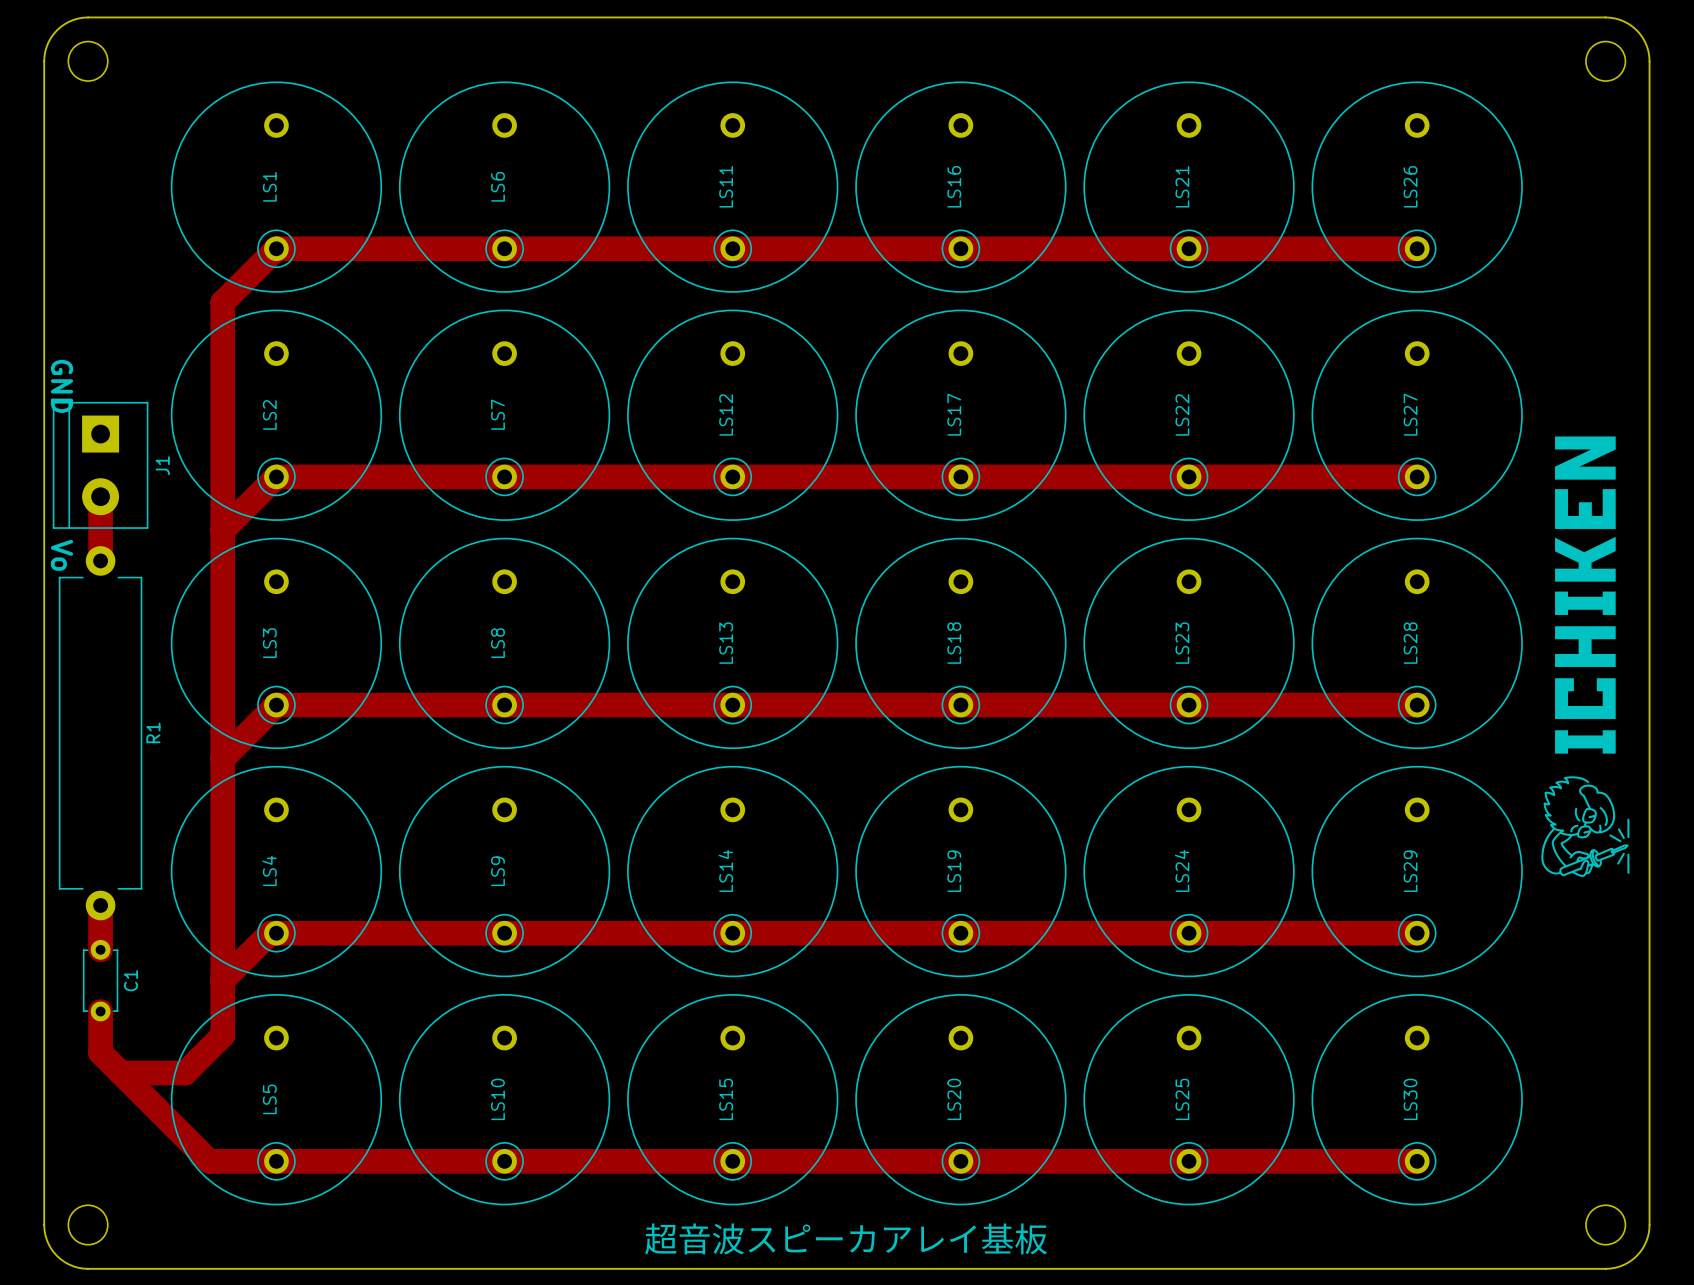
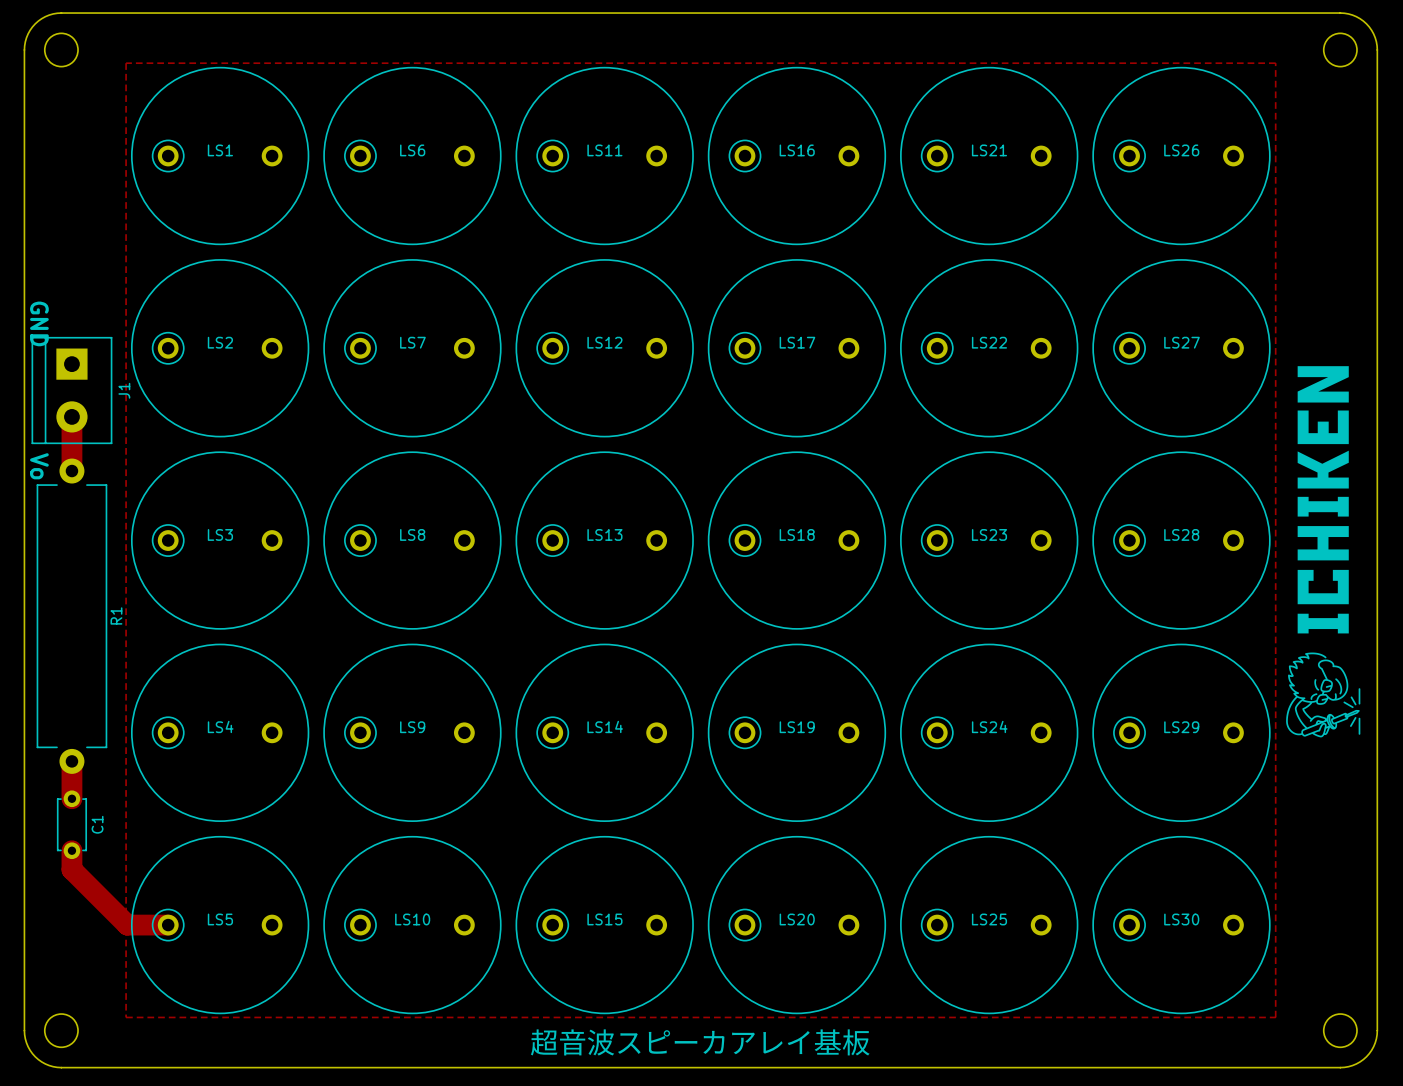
zone outline: none -> (126, 63) (126, 1017) (1275, 1017) (1275, 63) (126, 63)
LS1 rotation: 0° (276, 187) -> 90° clockwise (220, 156)
LS6 rotation: 0° (504, 187) -> 90° clockwise (412, 156)
LS11 rotation: 0° (732, 187) -> 90° clockwise (604, 156)
LS16 rotation: 0° (960, 187) -> 90° clockwise (796, 156)
LS21 rotation: 0° (1189, 187) -> 90° clockwise (989, 156)
LS26 rotation: 0° (1417, 187) -> 90° clockwise (1181, 156)
track: (1417, 248) (276, 248) (222, 302) (222, 1035) (185, 1073) (120, 1073) -> none
LS2 rotation: 0° (276, 415) -> 90° clockwise (220, 348)
LS7 rotation: 0° (504, 415) -> 90° clockwise (412, 348)
LS12 rotation: 0° (732, 415) -> 90° clockwise (604, 348)
LS17 rotation: 0° (960, 415) -> 90° clockwise (796, 348)
LS22 rotation: 0° (1189, 415) -> 90° clockwise (989, 348)
LS27 rotation: 0° (1417, 415) -> 90° clockwise (1181, 348)
track: (1417, 476) (276, 476) (222, 530) -> none
LS3 rotation: 0° (276, 643) -> 90° clockwise (220, 540)
LS8 rotation: 0° (504, 643) -> 90° clockwise (412, 540)
LS13 rotation: 0° (732, 643) -> 90° clockwise (604, 540)
LS18 rotation: 0° (960, 643) -> 90° clockwise (796, 540)
LS23 rotation: 0° (1189, 643) -> 90° clockwise (989, 540)
LS28 rotation: 0° (1417, 643) -> 90° clockwise (1181, 540)
track: (1417, 705) (276, 705) (222, 758) -> none
LS4 rotation: 0° (276, 871) -> 90° clockwise (220, 732)
LS9 rotation: 0° (504, 871) -> 90° clockwise (412, 732)
LS14 rotation: 0° (732, 871) -> 90° clockwise (604, 732)
LS19 rotation: 0° (960, 871) -> 90° clockwise (796, 732)
LS24 rotation: 0° (1189, 871) -> 90° clockwise (989, 732)
LS29 rotation: 0° (1417, 871) -> 90° clockwise (1181, 732)
track: (1417, 933) (270, 933) (222, 980) -> none
track: (100, 1033) (100, 1052) (209, 1161) (1417, 1161) -> (71, 869) (127, 925) (168, 925)
LS5 rotation: 0° (276, 1099) -> 90° clockwise (220, 925)
LS10 rotation: 0° (504, 1099) -> 90° clockwise (412, 925)
LS15 rotation: 0° (732, 1099) -> 90° clockwise (604, 925)
LS20 rotation: 0° (960, 1099) -> 90° clockwise (796, 925)
LS25 rotation: 0° (1189, 1099) -> 90° clockwise (989, 925)
LS30 rotation: 0° (1417, 1099) -> 90° clockwise (1181, 925)

